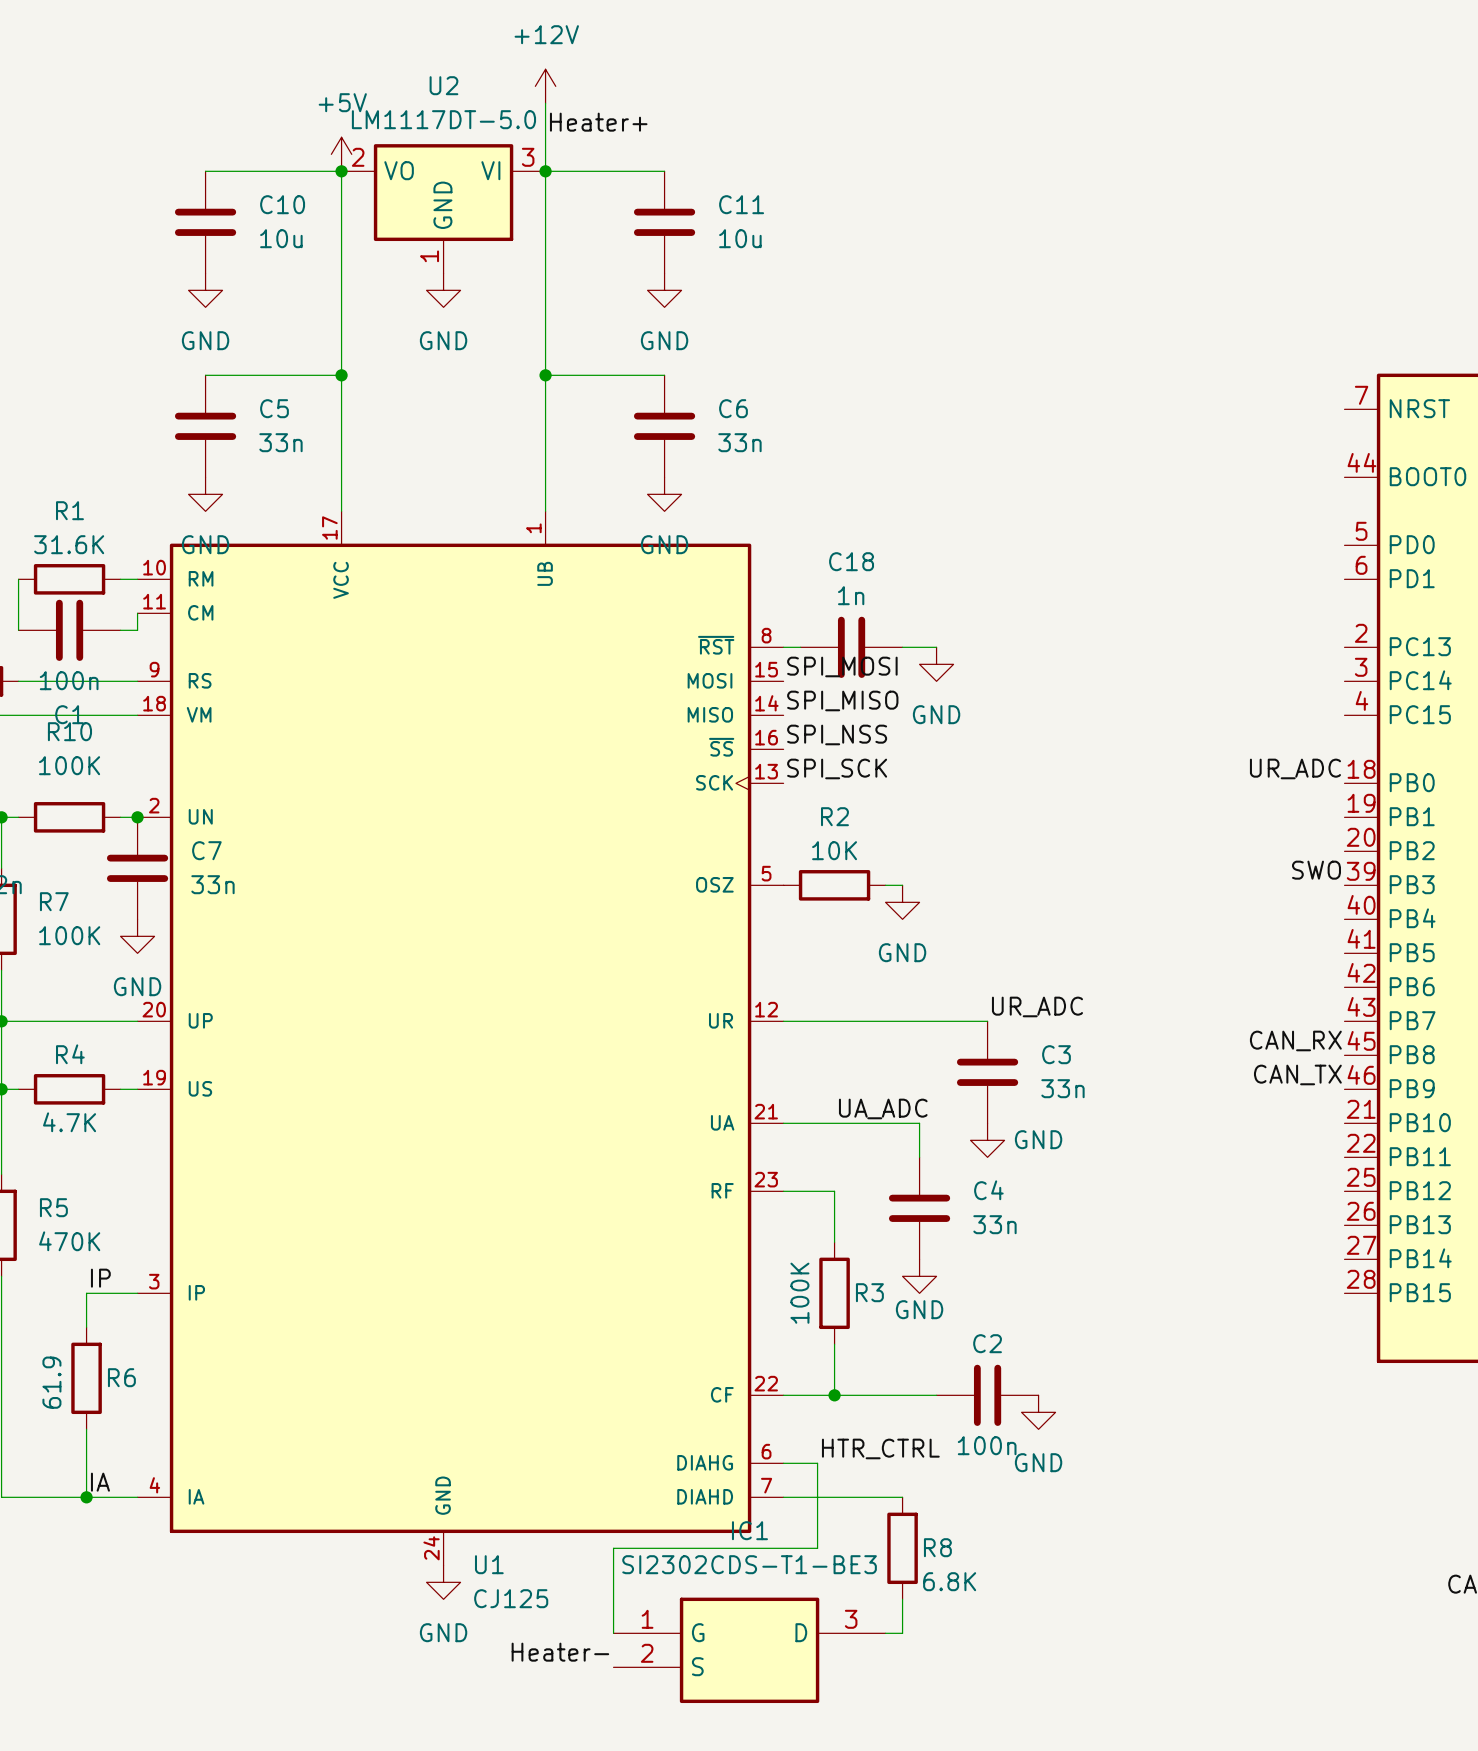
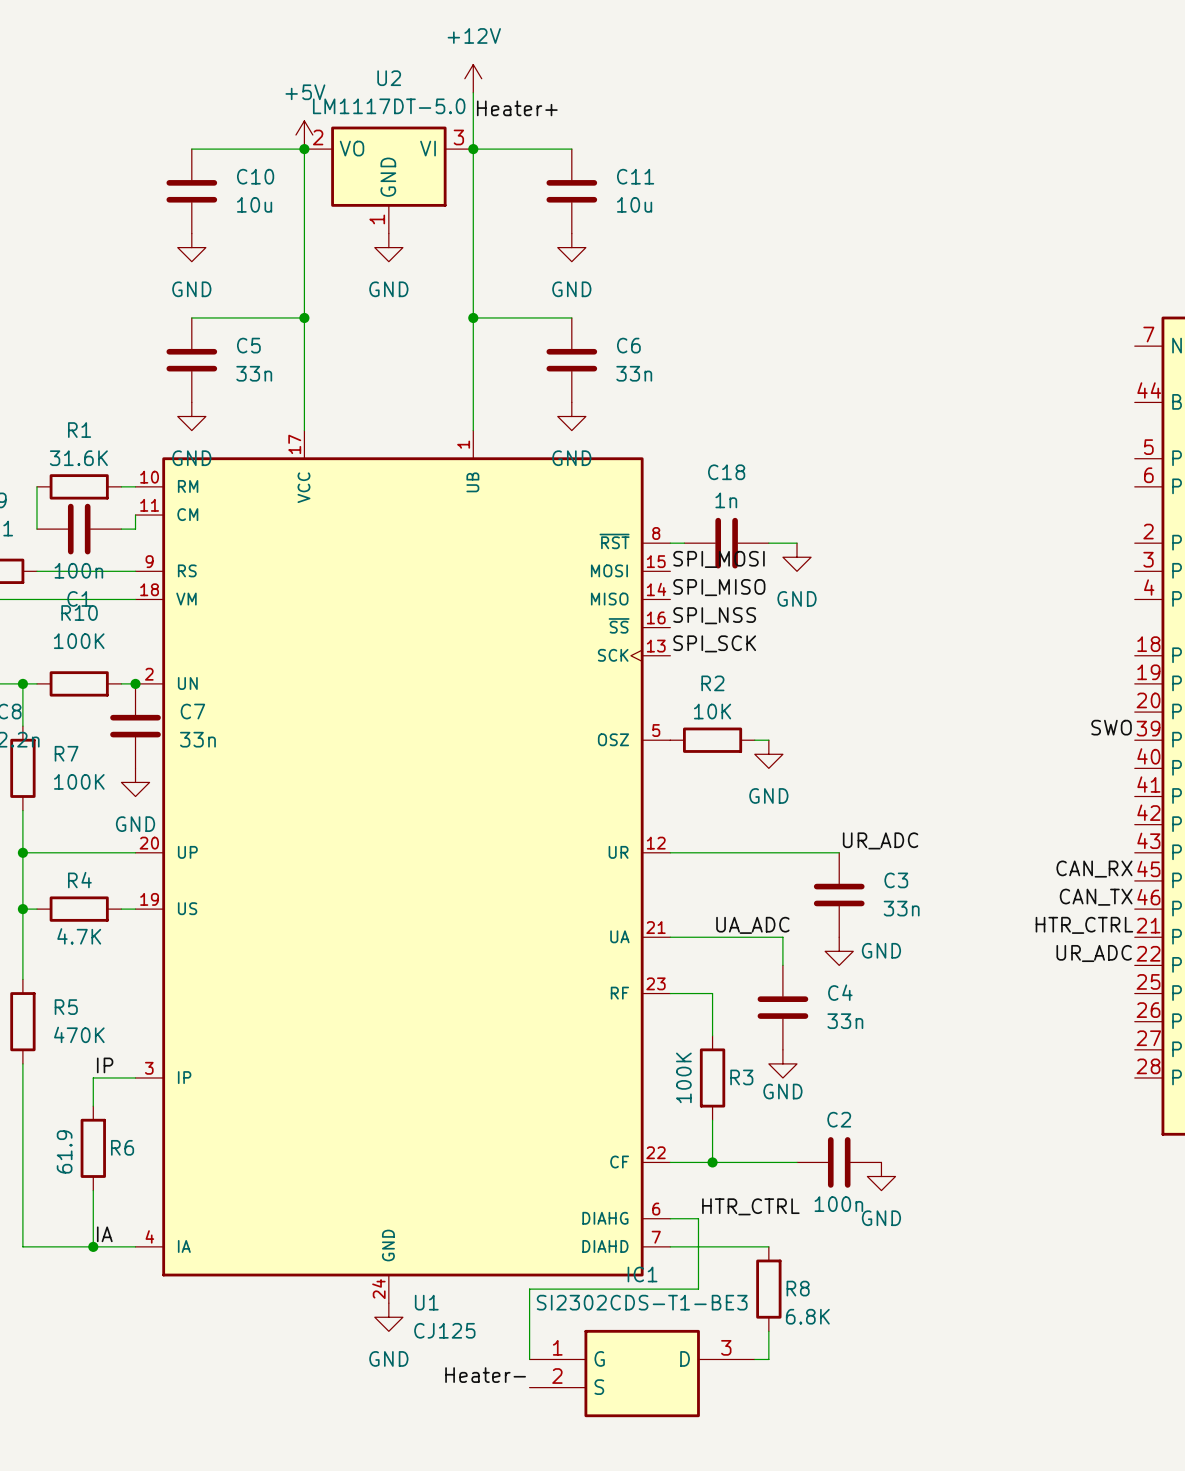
label: UR_ADC (1295, 768) -> none
label: none -> HTR_CTRL (1084, 925)
label: none -> UR_ADC (1094, 953)

